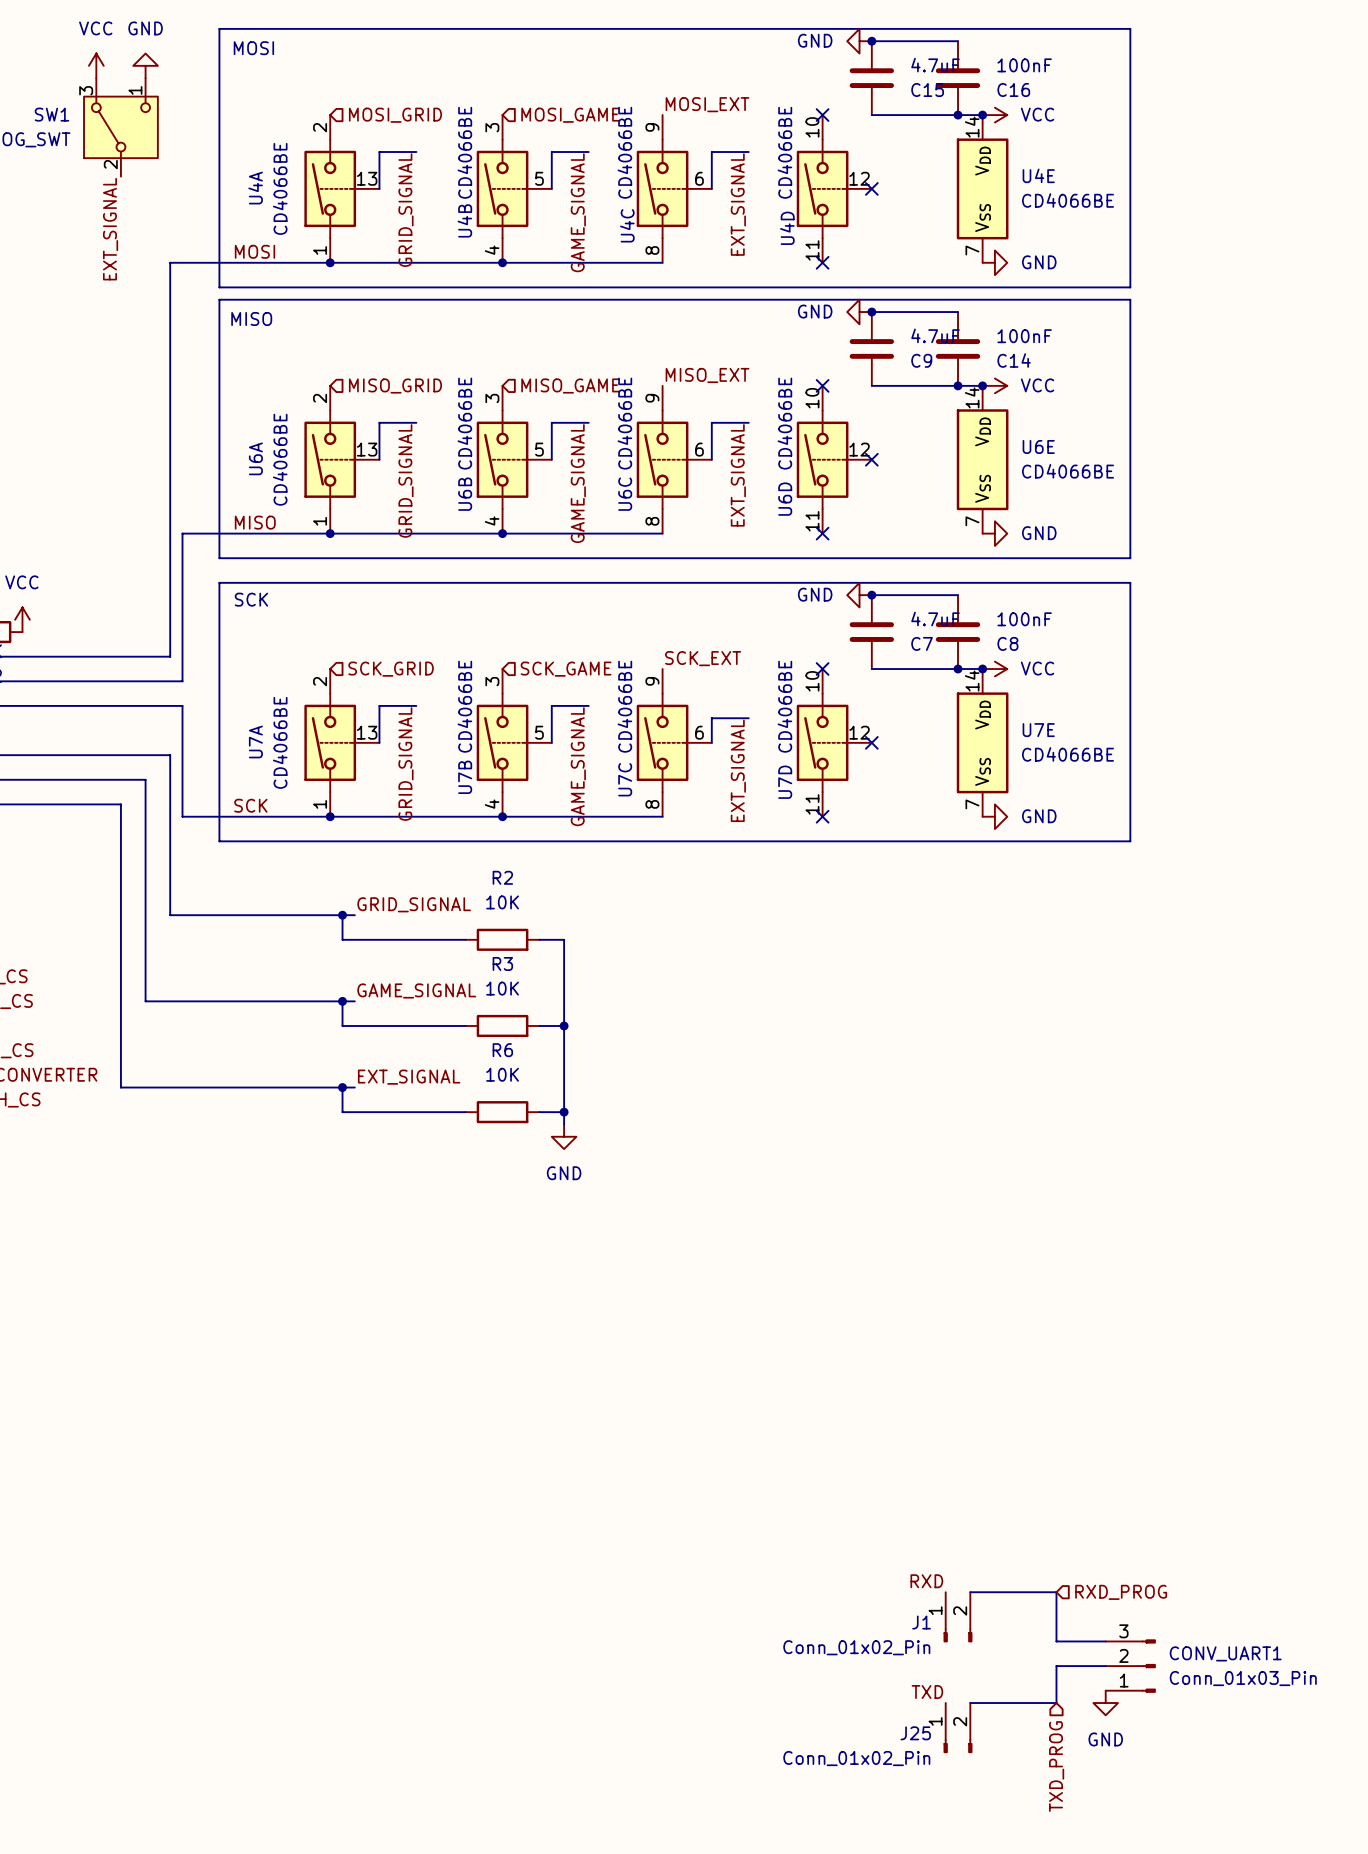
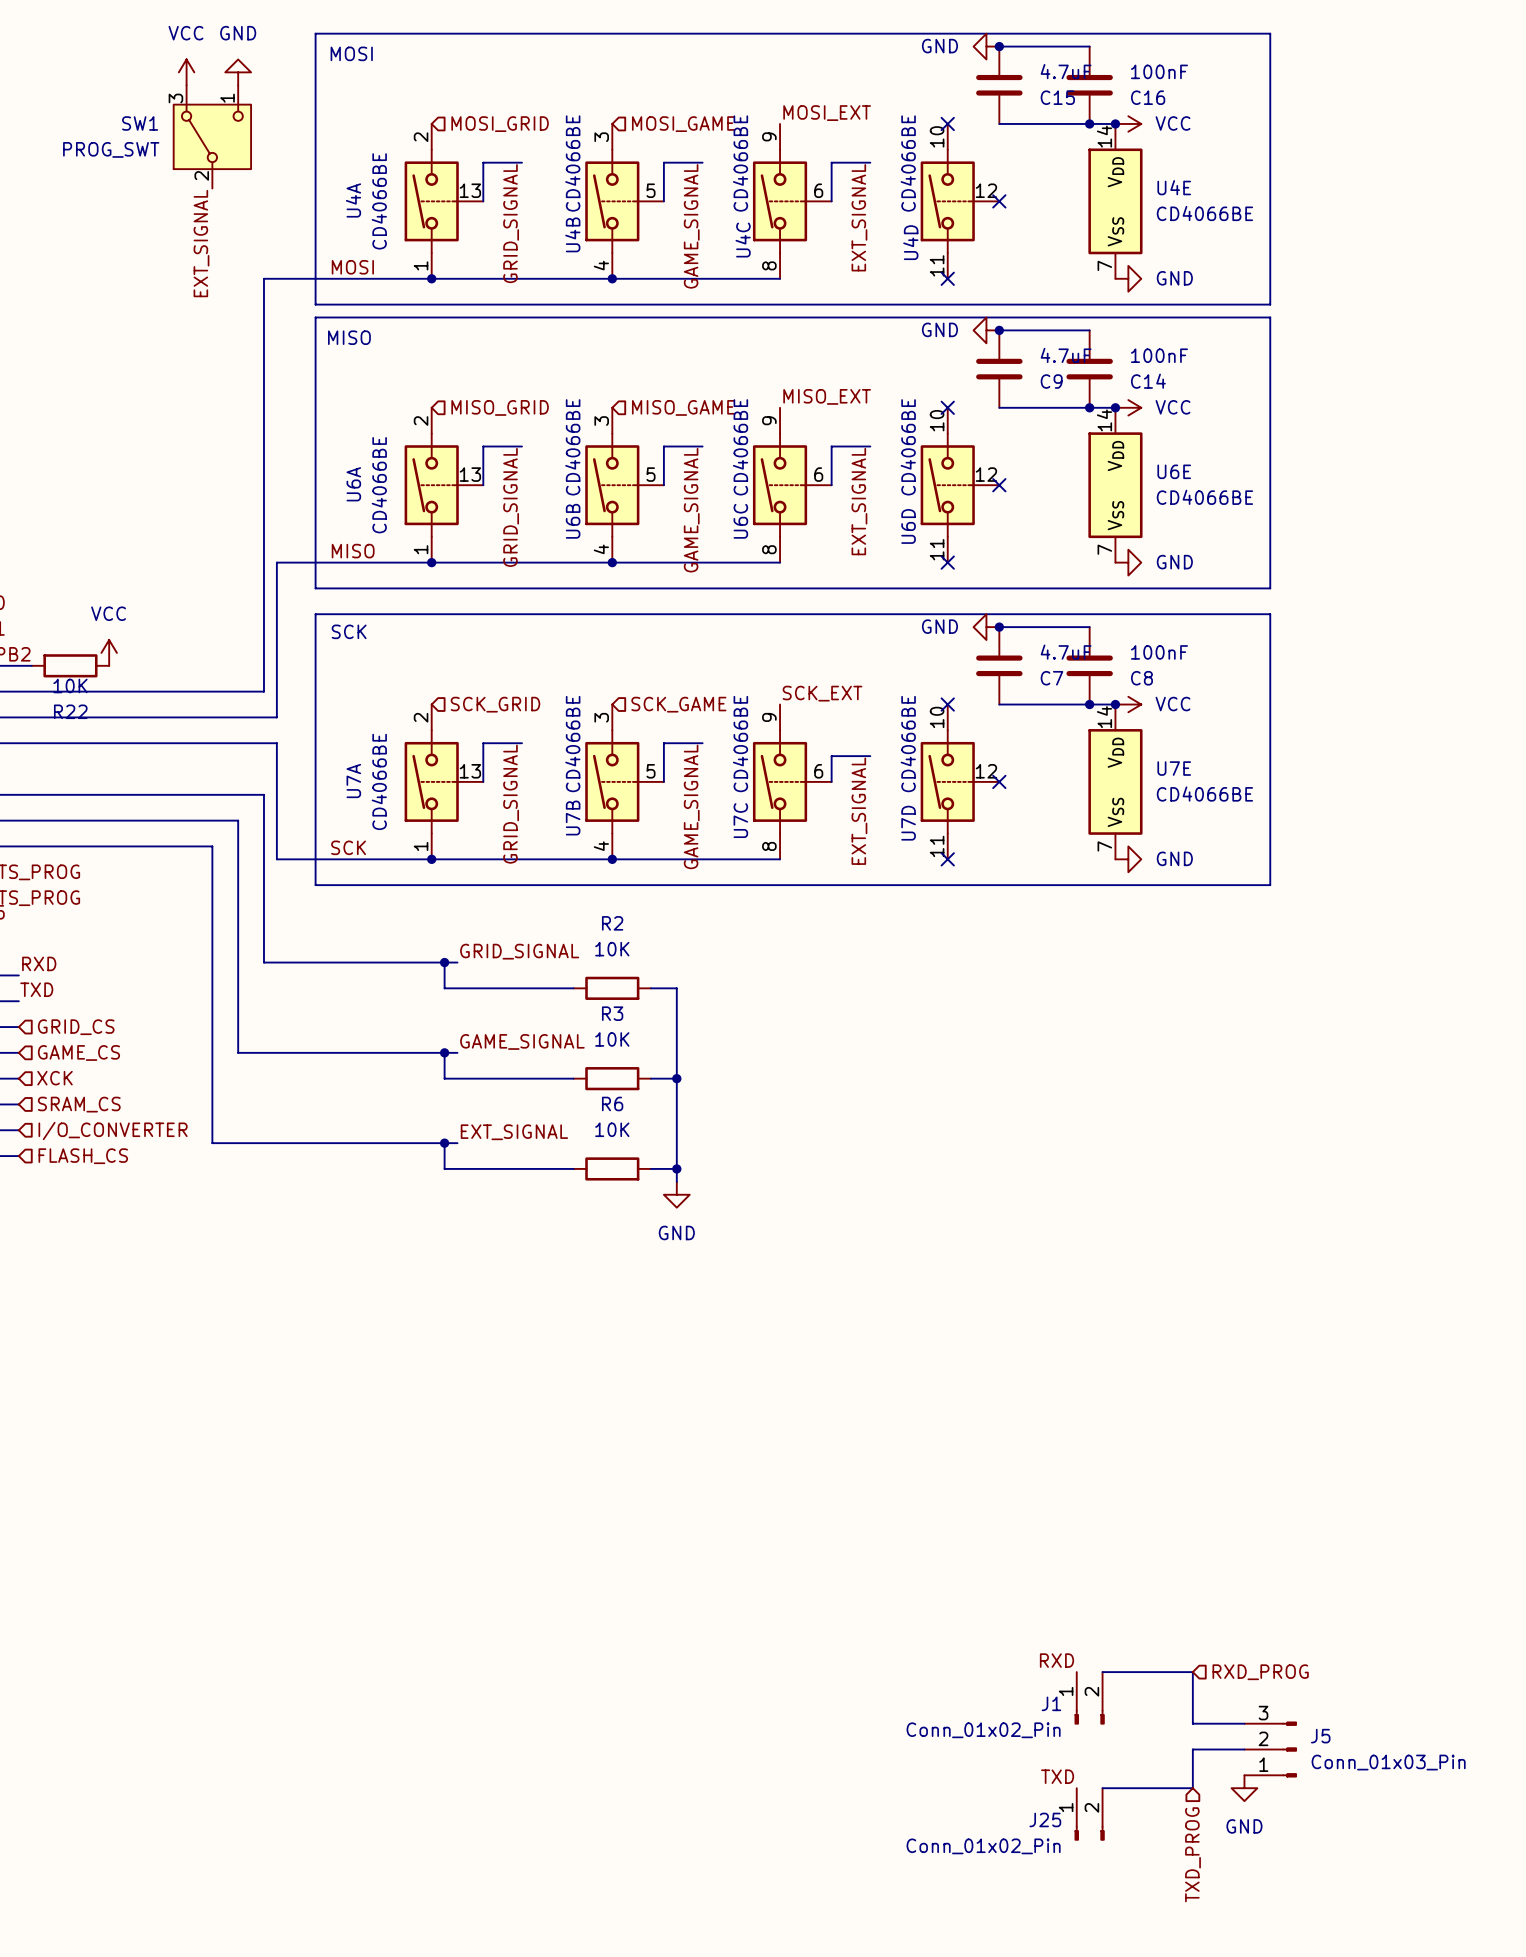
CONV_UART1 name: CONV_UART1 (1225, 1653) -> J5 (1320, 1736)

